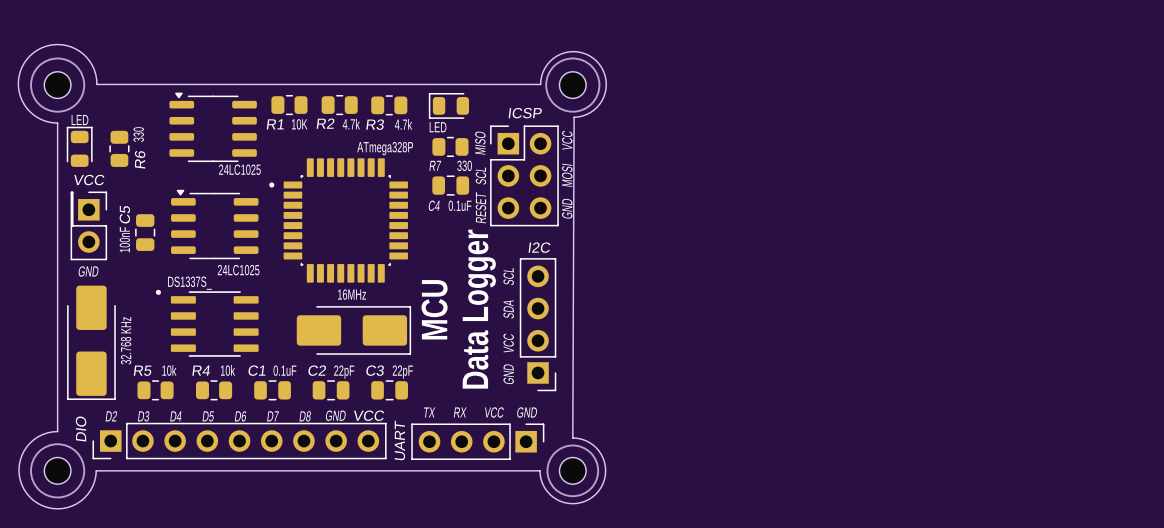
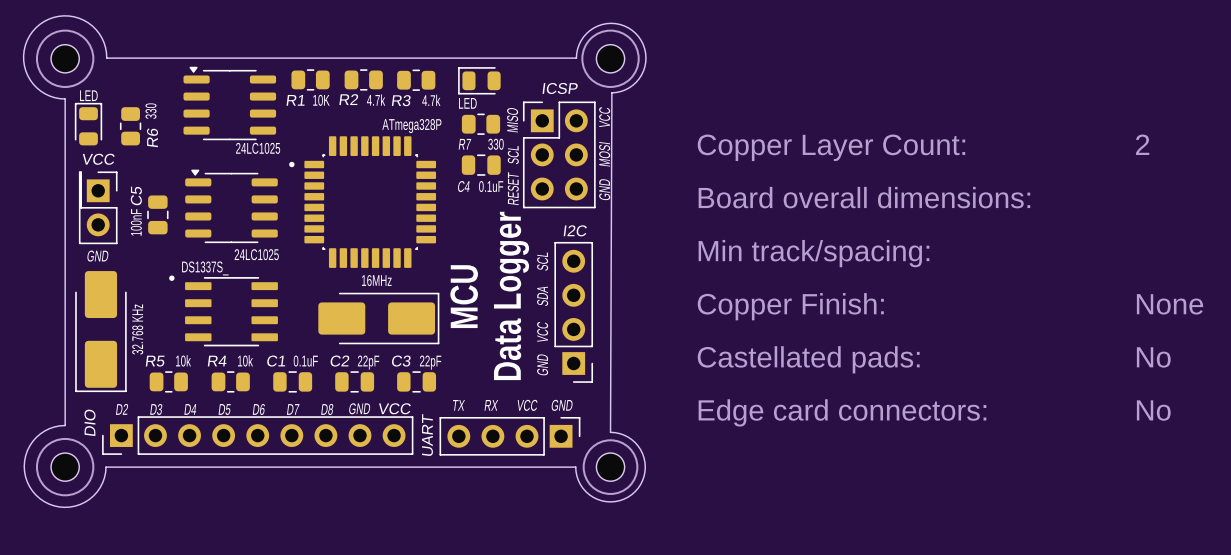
text: none -> 2 (1142, 144)
text: none -> Copper Layer Count: (831, 147)
text: none -> Board overall dimensions: (864, 197)
text: none -> Min track/spacing: (814, 253)
text: none -> None (1170, 304)
text: none -> Copper Finish: (790, 306)
text: none -> No (1153, 357)
text: none -> Castellated pads: (808, 359)
text: none -> No (1153, 410)
text: none -> Edge card connectors: (842, 412)

